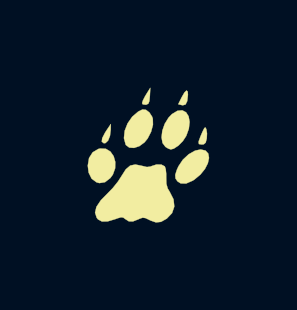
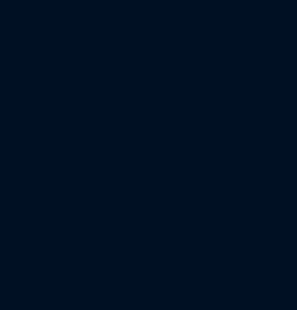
drawing: [87, 87, 210, 223] -> none

